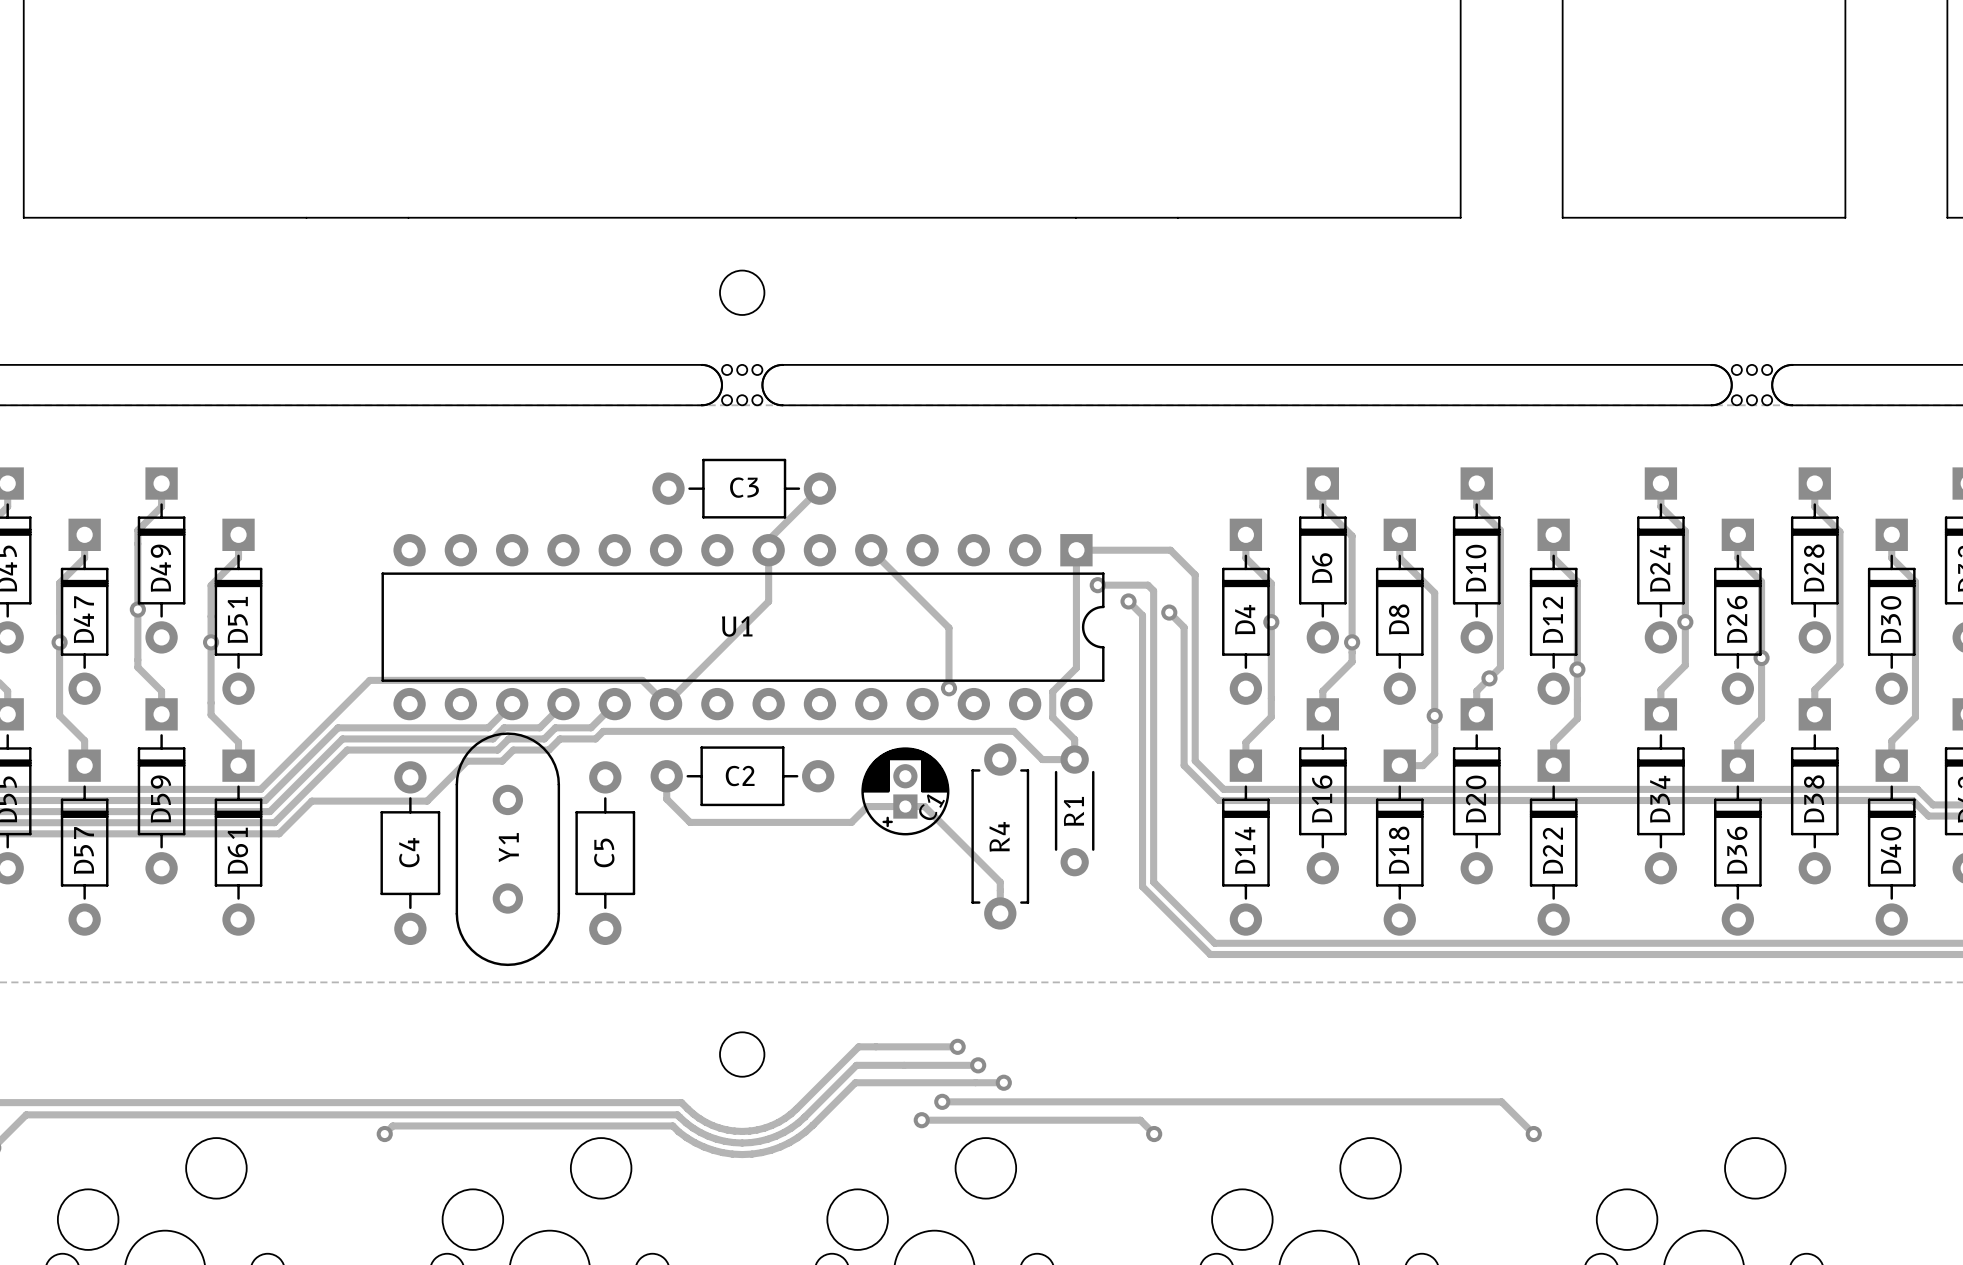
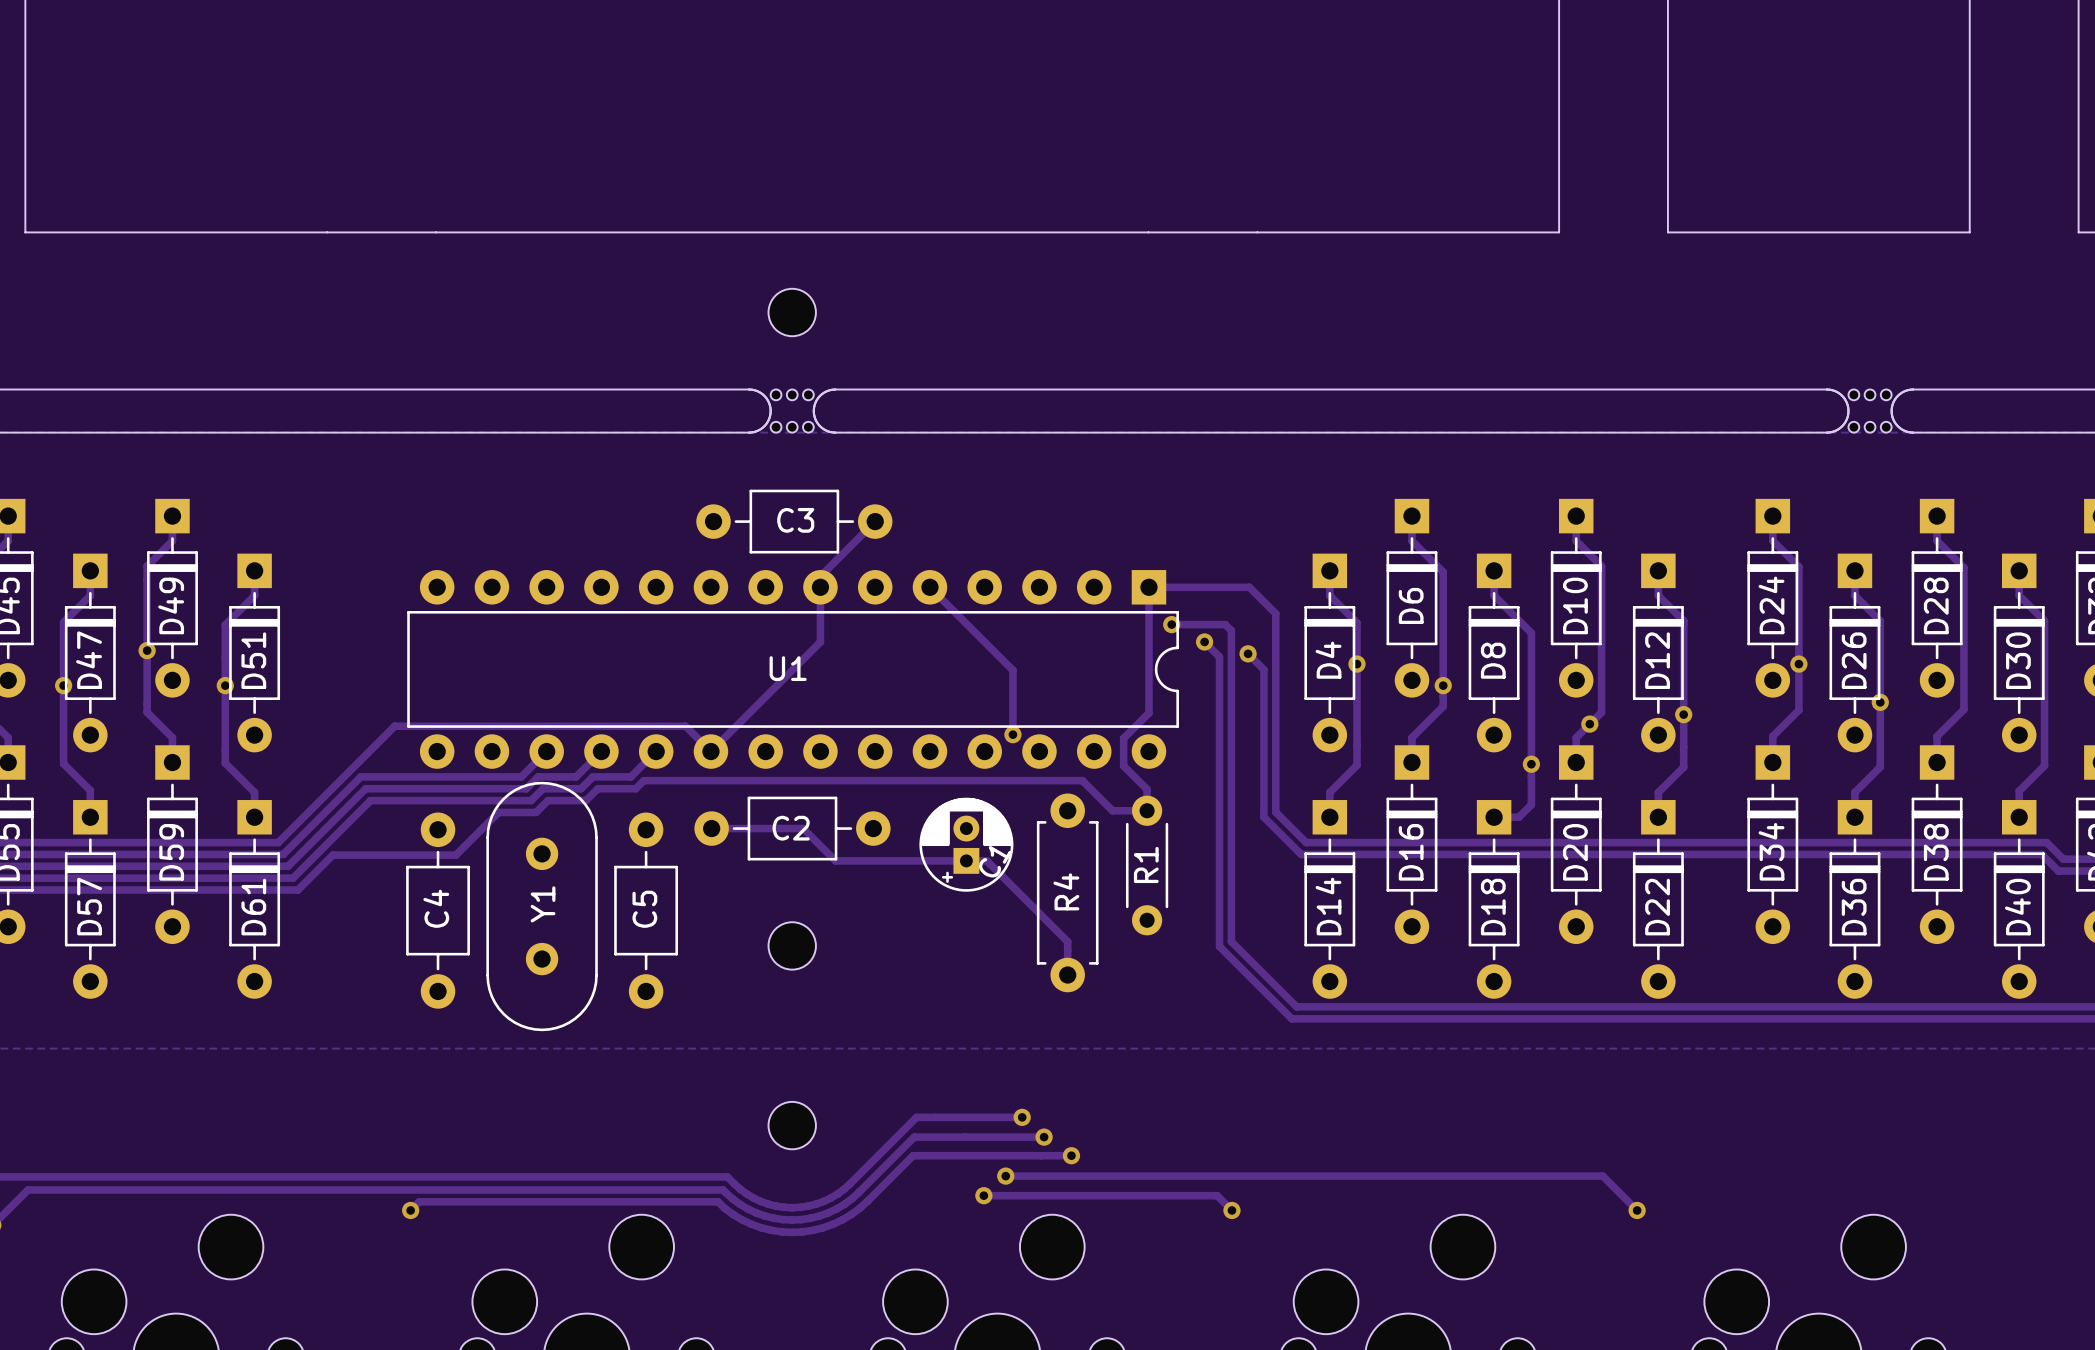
track: (666, 776) (666, 799) (690, 822) (851, 822) (867, 806) -> (711, 828) (803, 828) (835, 860) (925, 860)
part: none -> (792, 945)

